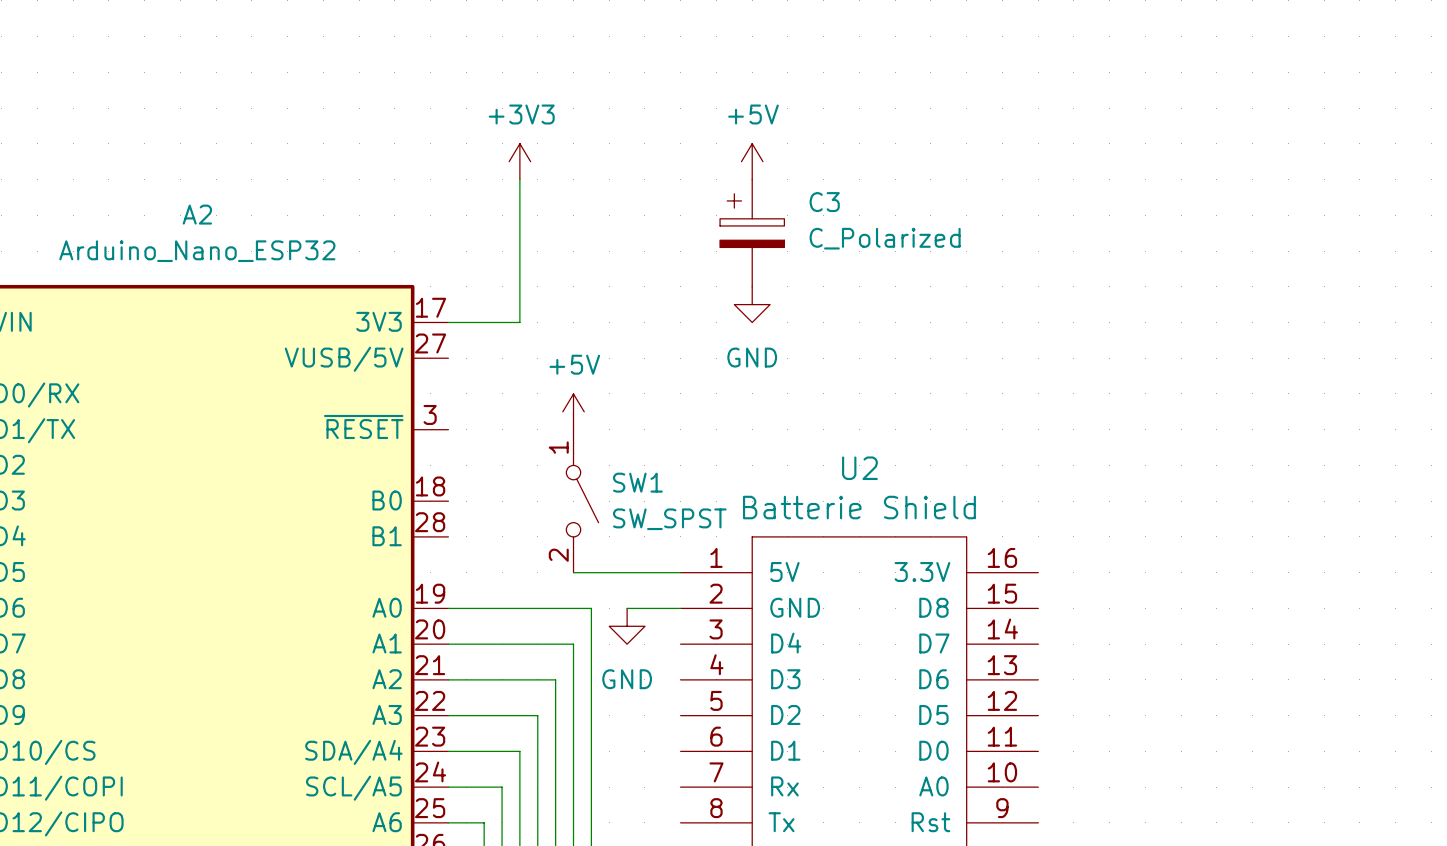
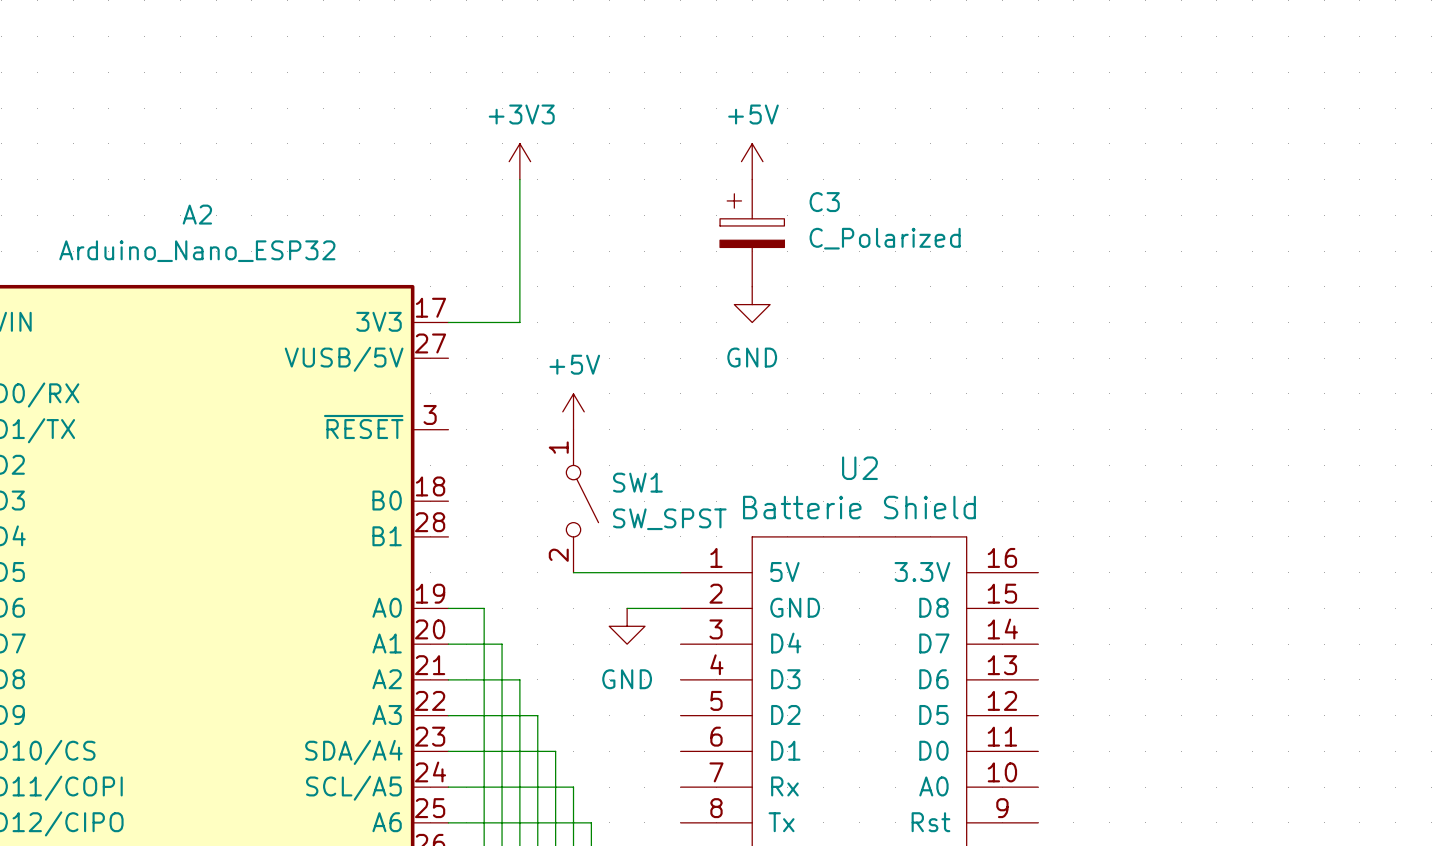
wire: (484, 608) (591, 608) (591, 822) -> (484, 608) (484, 822) (591, 822)
wire: (502, 644) (573, 644) (573, 787) -> (502, 644) (502, 787) (573, 787)
wire: (519, 679) (555, 679) (555, 751) -> (519, 679) (519, 751) (555, 751)

